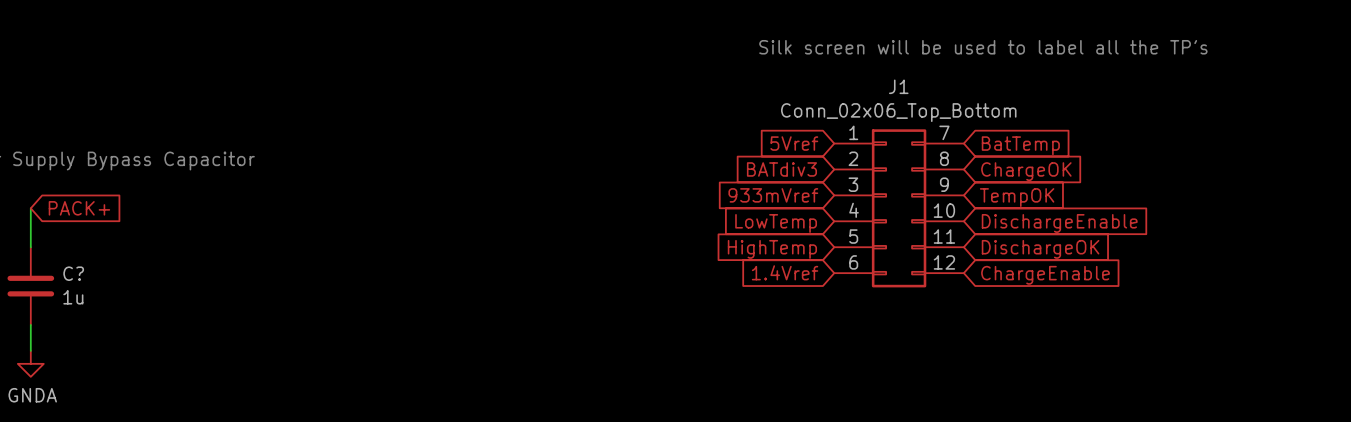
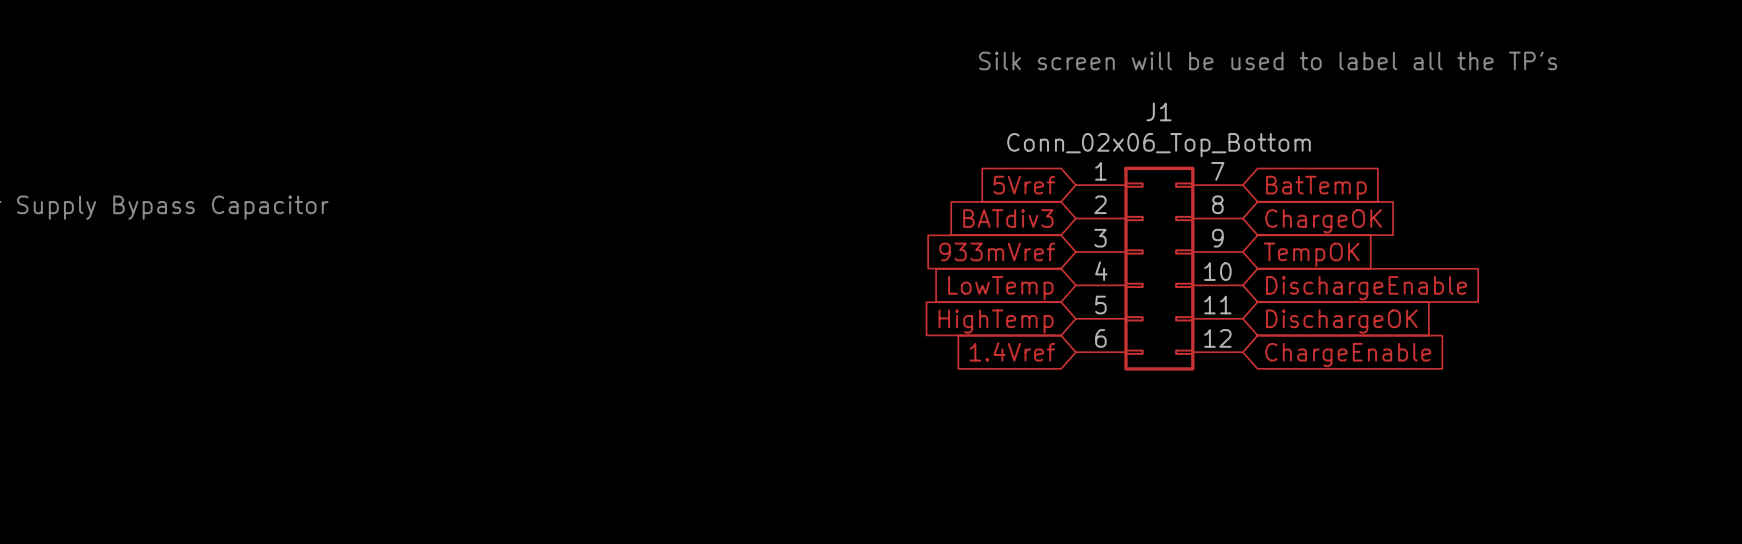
wire: (30, 208) (30, 247) -> none
global label: PACK+ (79, 208) -> none
C?: 1u (30, 286) -> none
wire: (30, 324) (30, 350) -> none
power symbol: GNDA (30, 363) -> none

